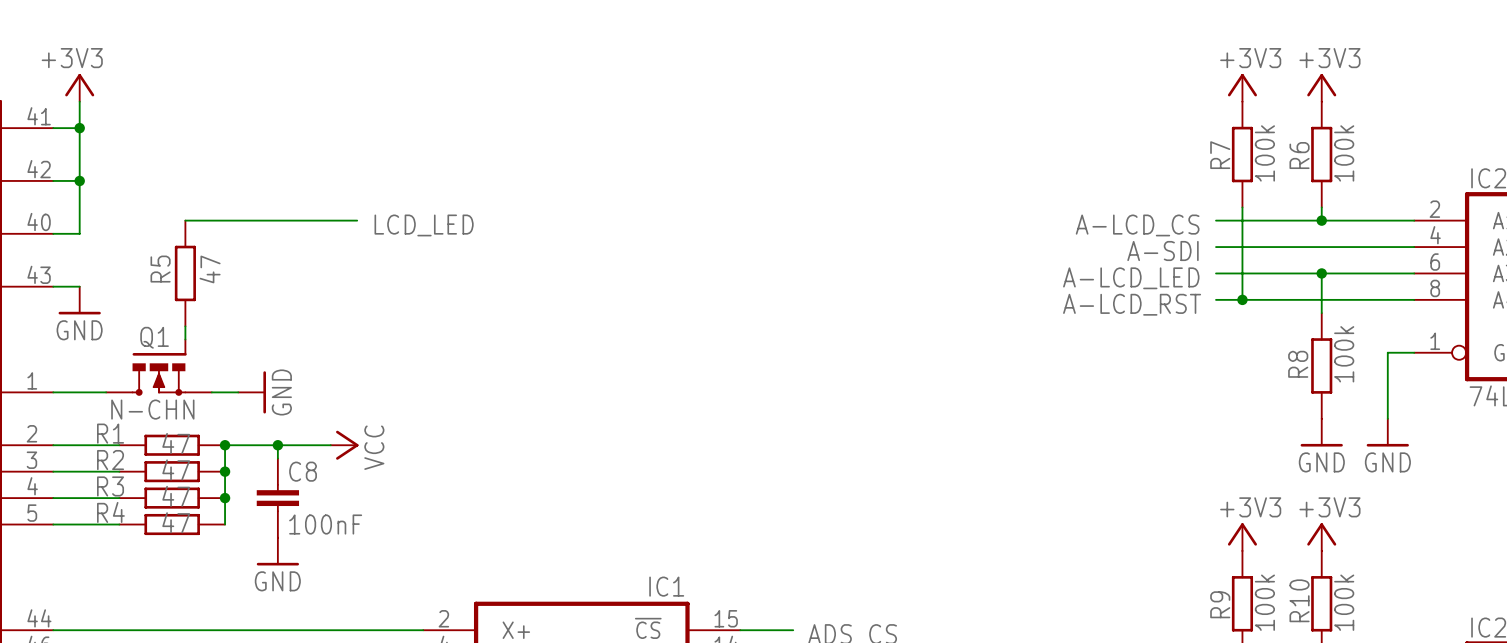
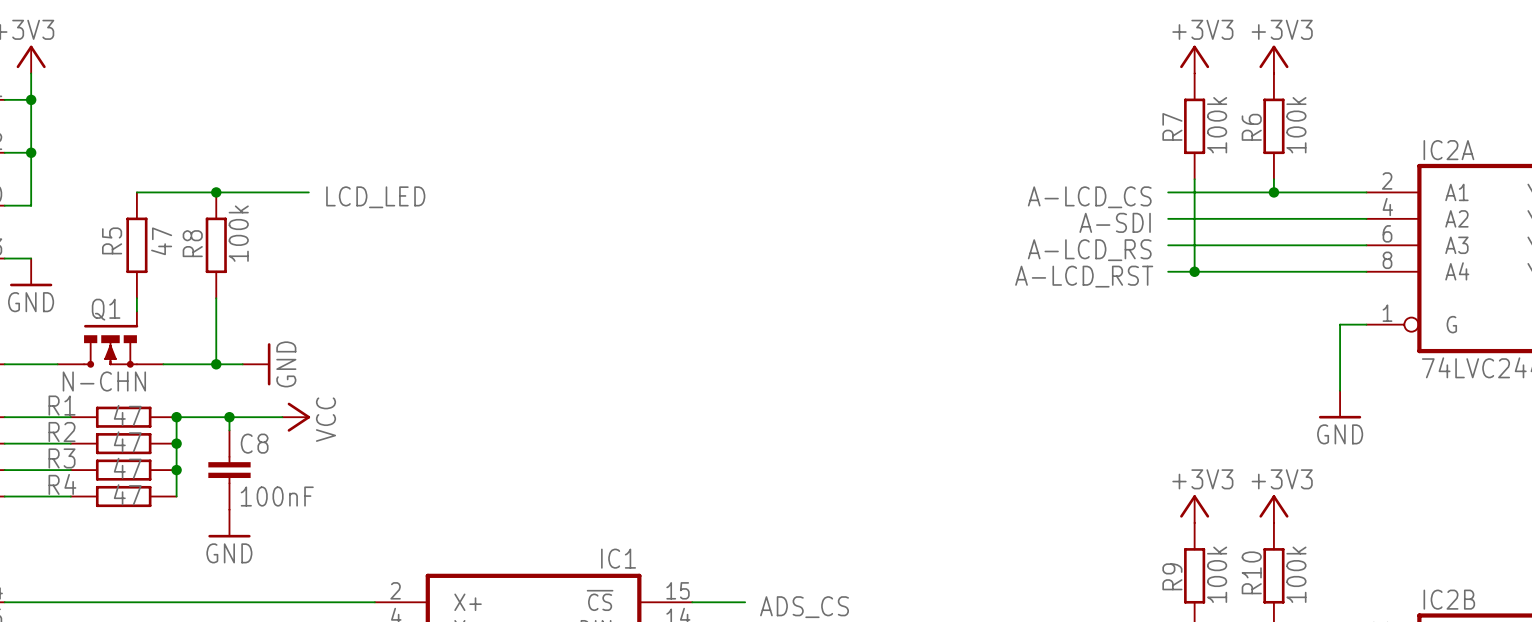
junction: none -> (216, 192)
wire: (1321, 273) (1321, 313) -> none
junction: (1321, 273) -> none
label: A-LCD_LED (1131, 278) -> A-LCD_RS (1089, 250)
wire: none -> (216, 298) (216, 364)
R8 position: (1321, 365) -> (216, 245)
power symbol position: GND (252, 392) -> GND (256, 364)
junction: none -> (216, 364)
power symbol: GND (1321, 432) -> none

